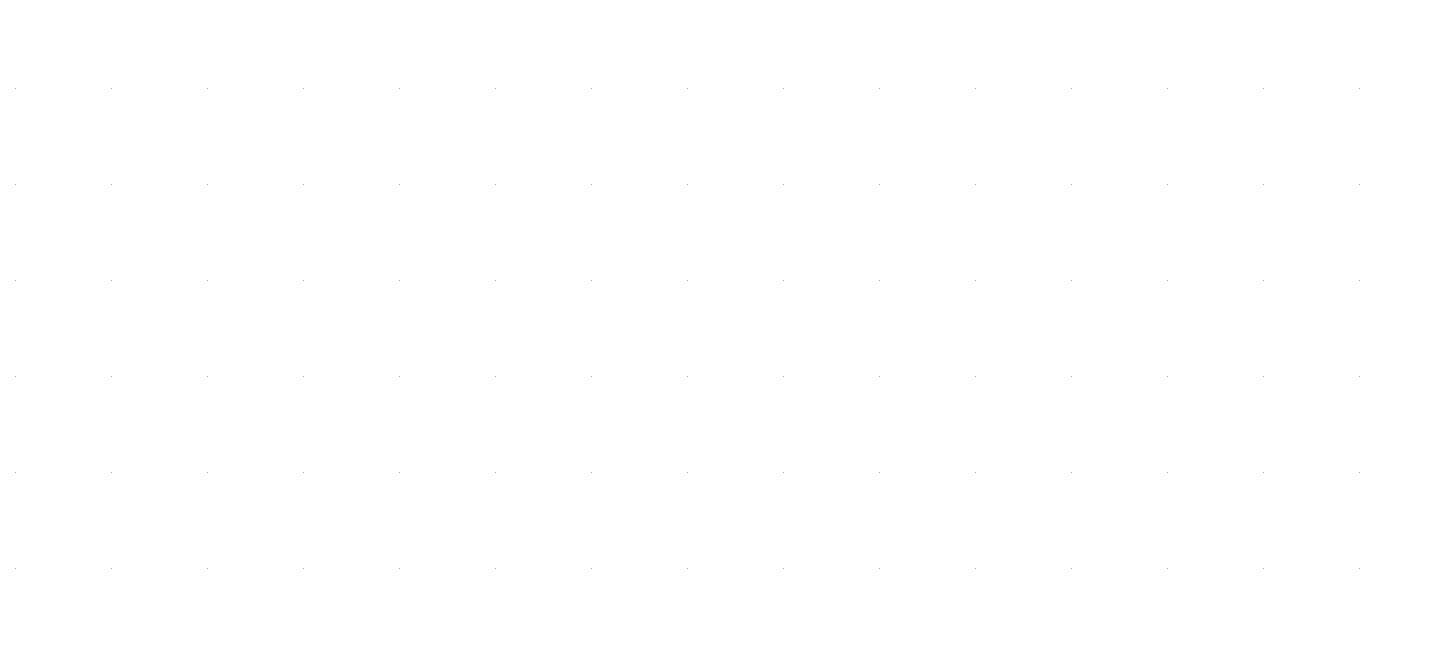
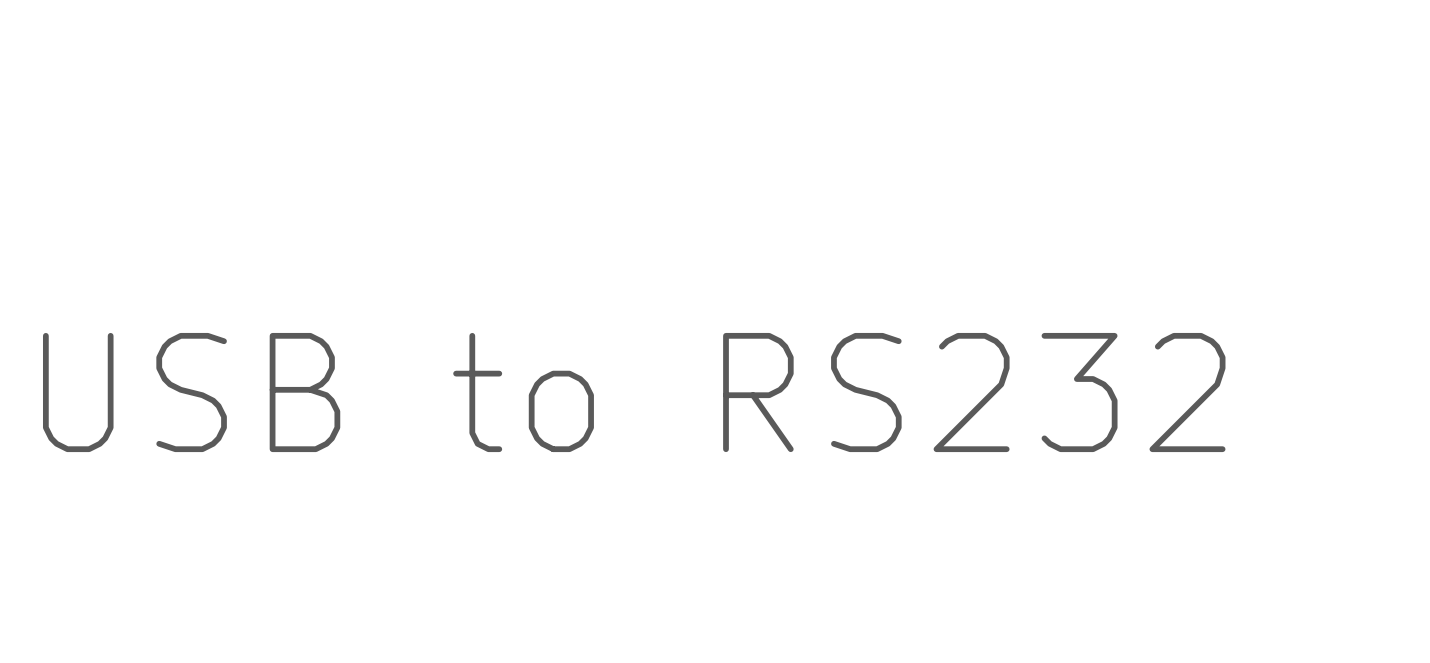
text: none -> USB to RS232 (634, 392)

